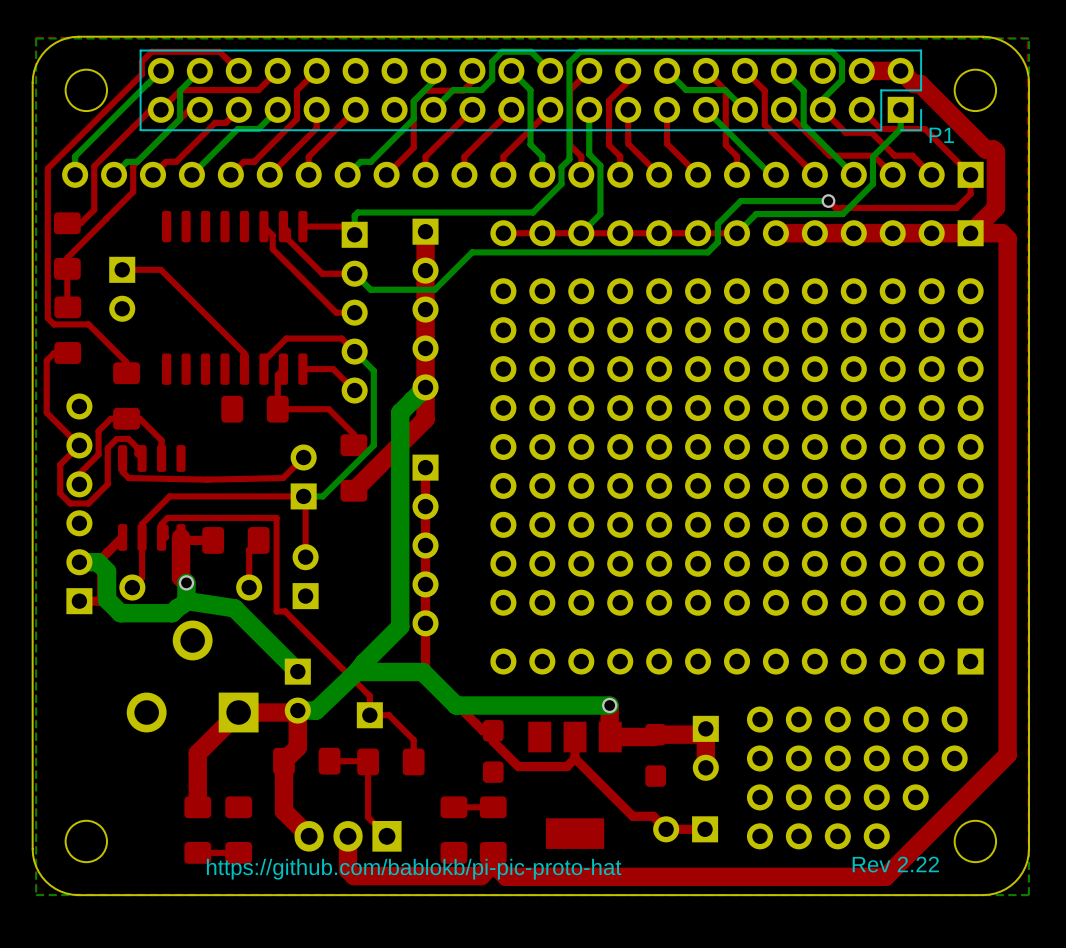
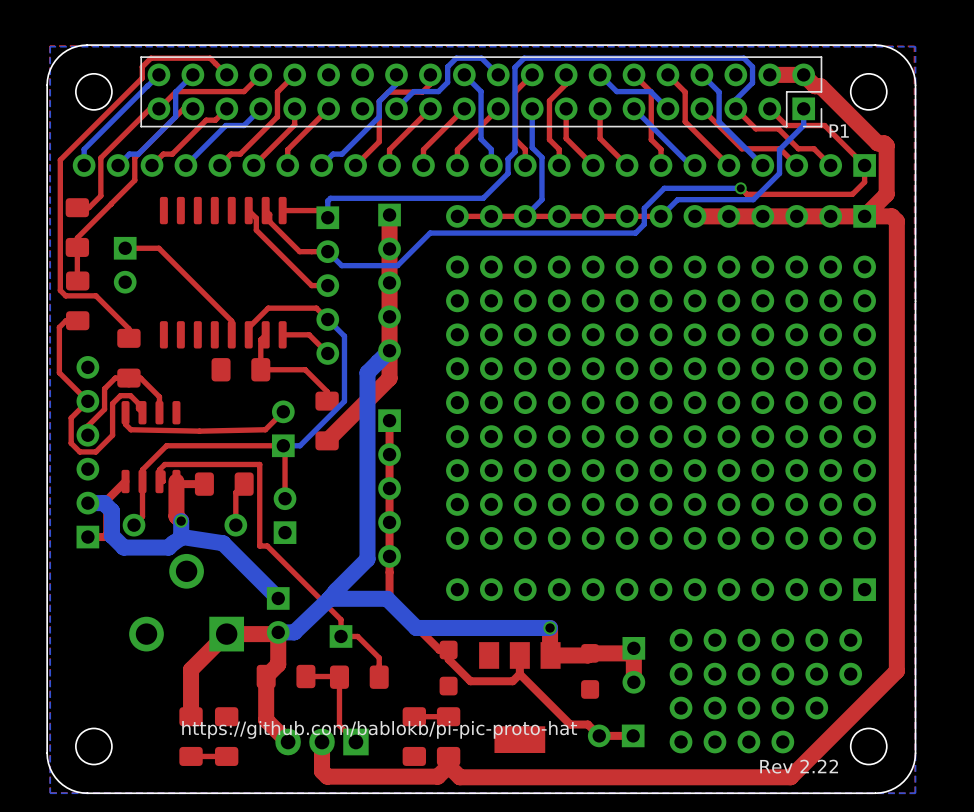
text position: https://github.com/bablokb/pi-pic-proto-hat (414, 869) -> https://github.com/bablokb/pi-pic-proto-hat (379, 729)

